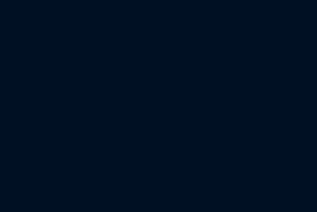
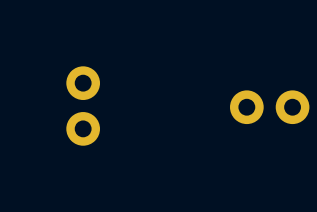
part: none -> (83, 106)
part: none -> (269, 107)

